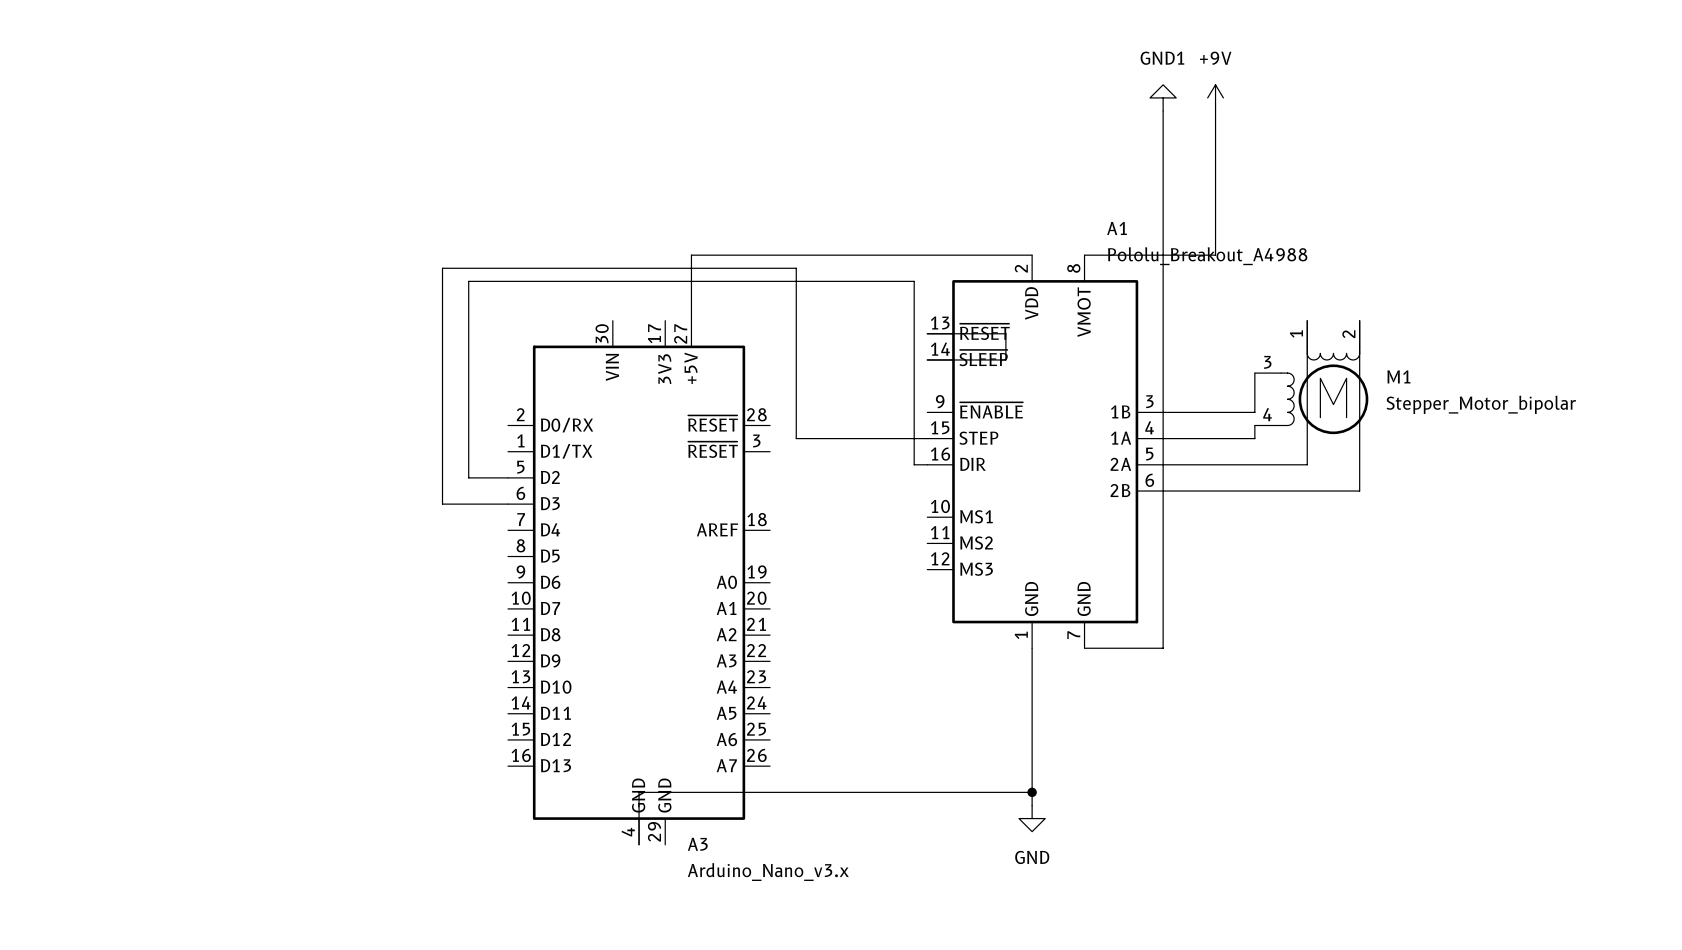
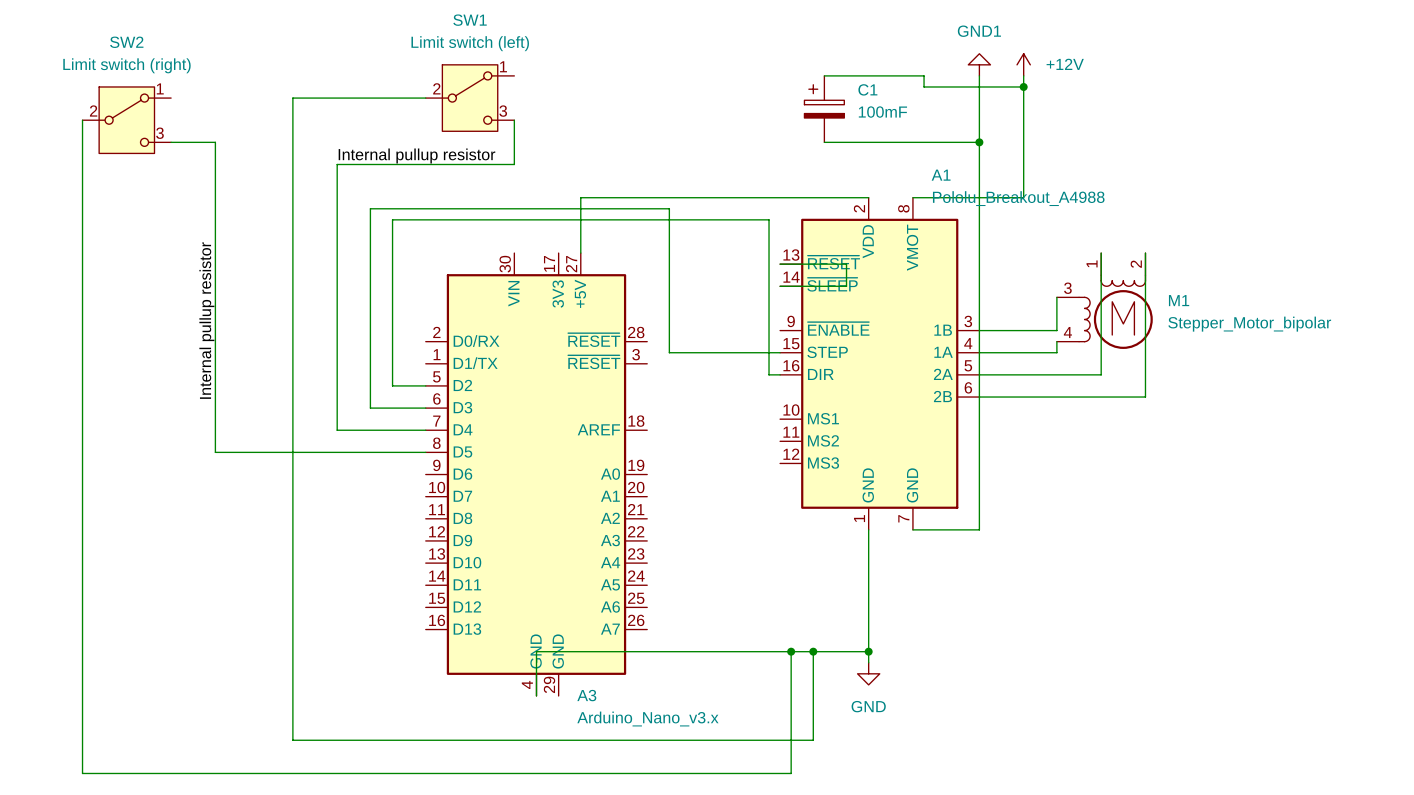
power symbol: +9V (1215, 97) -> +12V (1023, 64)
wire: none -> (824, 75) (924, 75) (924, 86) (1023, 86)
junction: none -> (1023, 86)
wire: none -> (425, 98) (292, 98) (292, 740) (813, 740) (813, 651)
SW1: none -> Limit switch (left) (470, 98)
C1: none -> 100mF (824, 109)
wire: none -> (82, 120) (82, 773) (791, 773) (791, 651)
SW2: none -> Limit switch (right) (126, 120)
wire: none -> (514, 120) (514, 164) (337, 164) (337, 430) (425, 430)
wire: none -> (171, 142) (215, 142) (215, 452) (425, 452)
wire: none -> (824, 142) (979, 142)
junction: none -> (979, 142)
label: none -> Internal pullup resistor (416, 155)
label: none -> Internal pullup resistor (206, 320)
junction: none -> (791, 651)
junction: none -> (813, 651)

